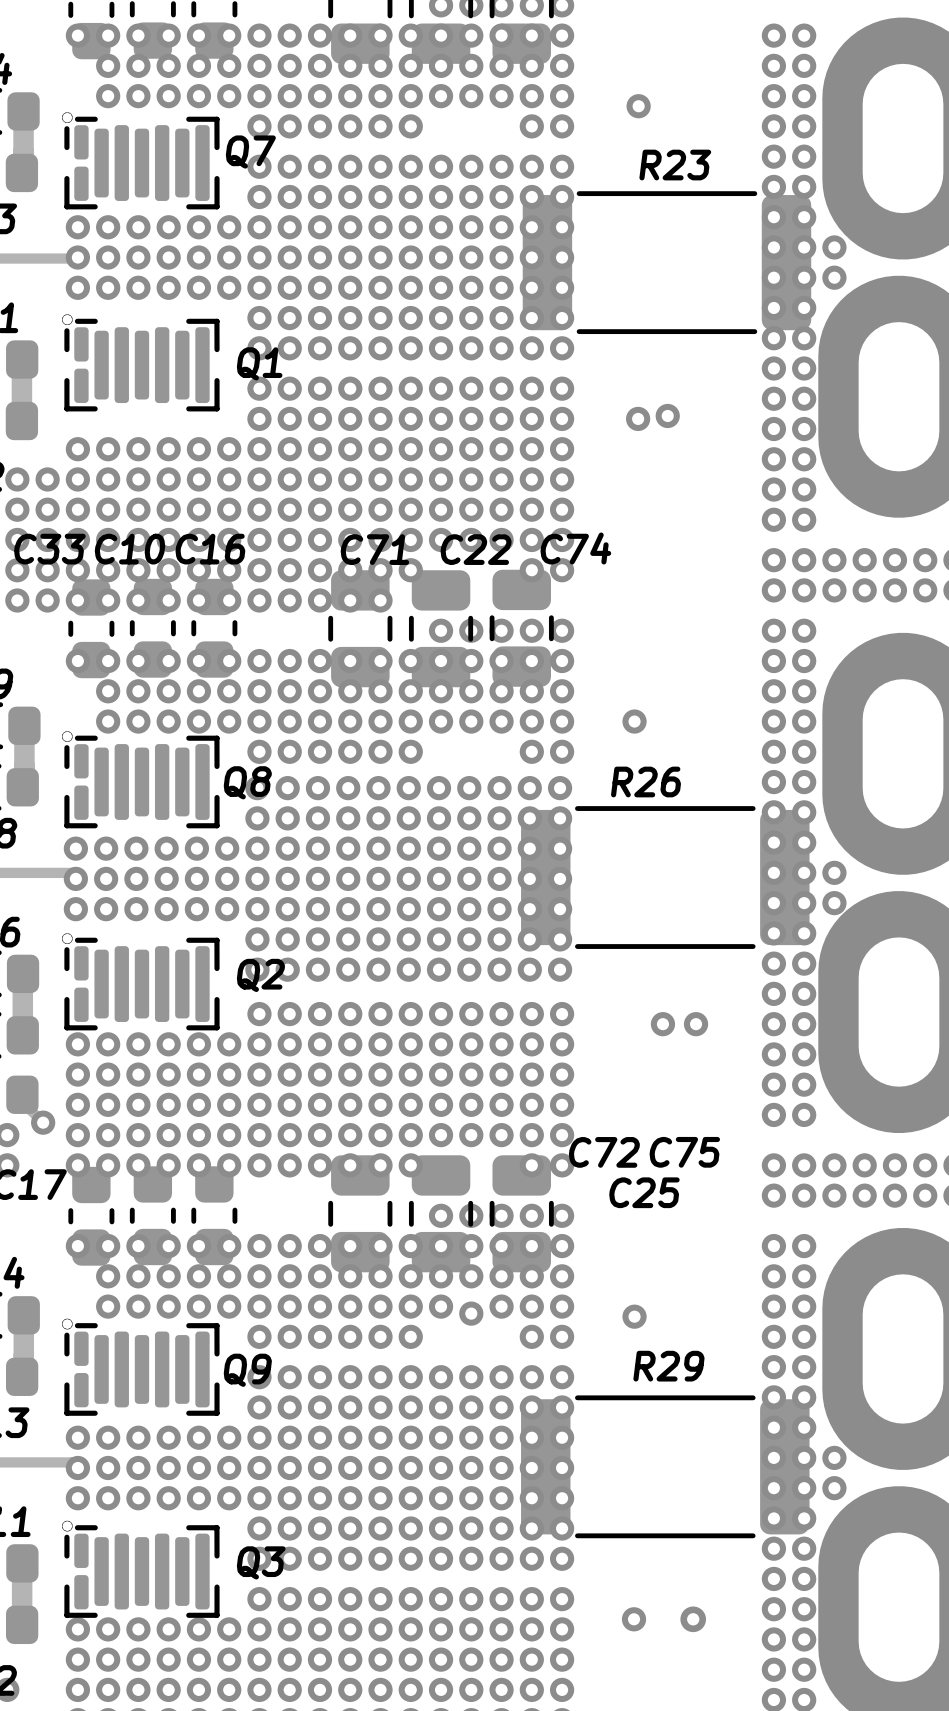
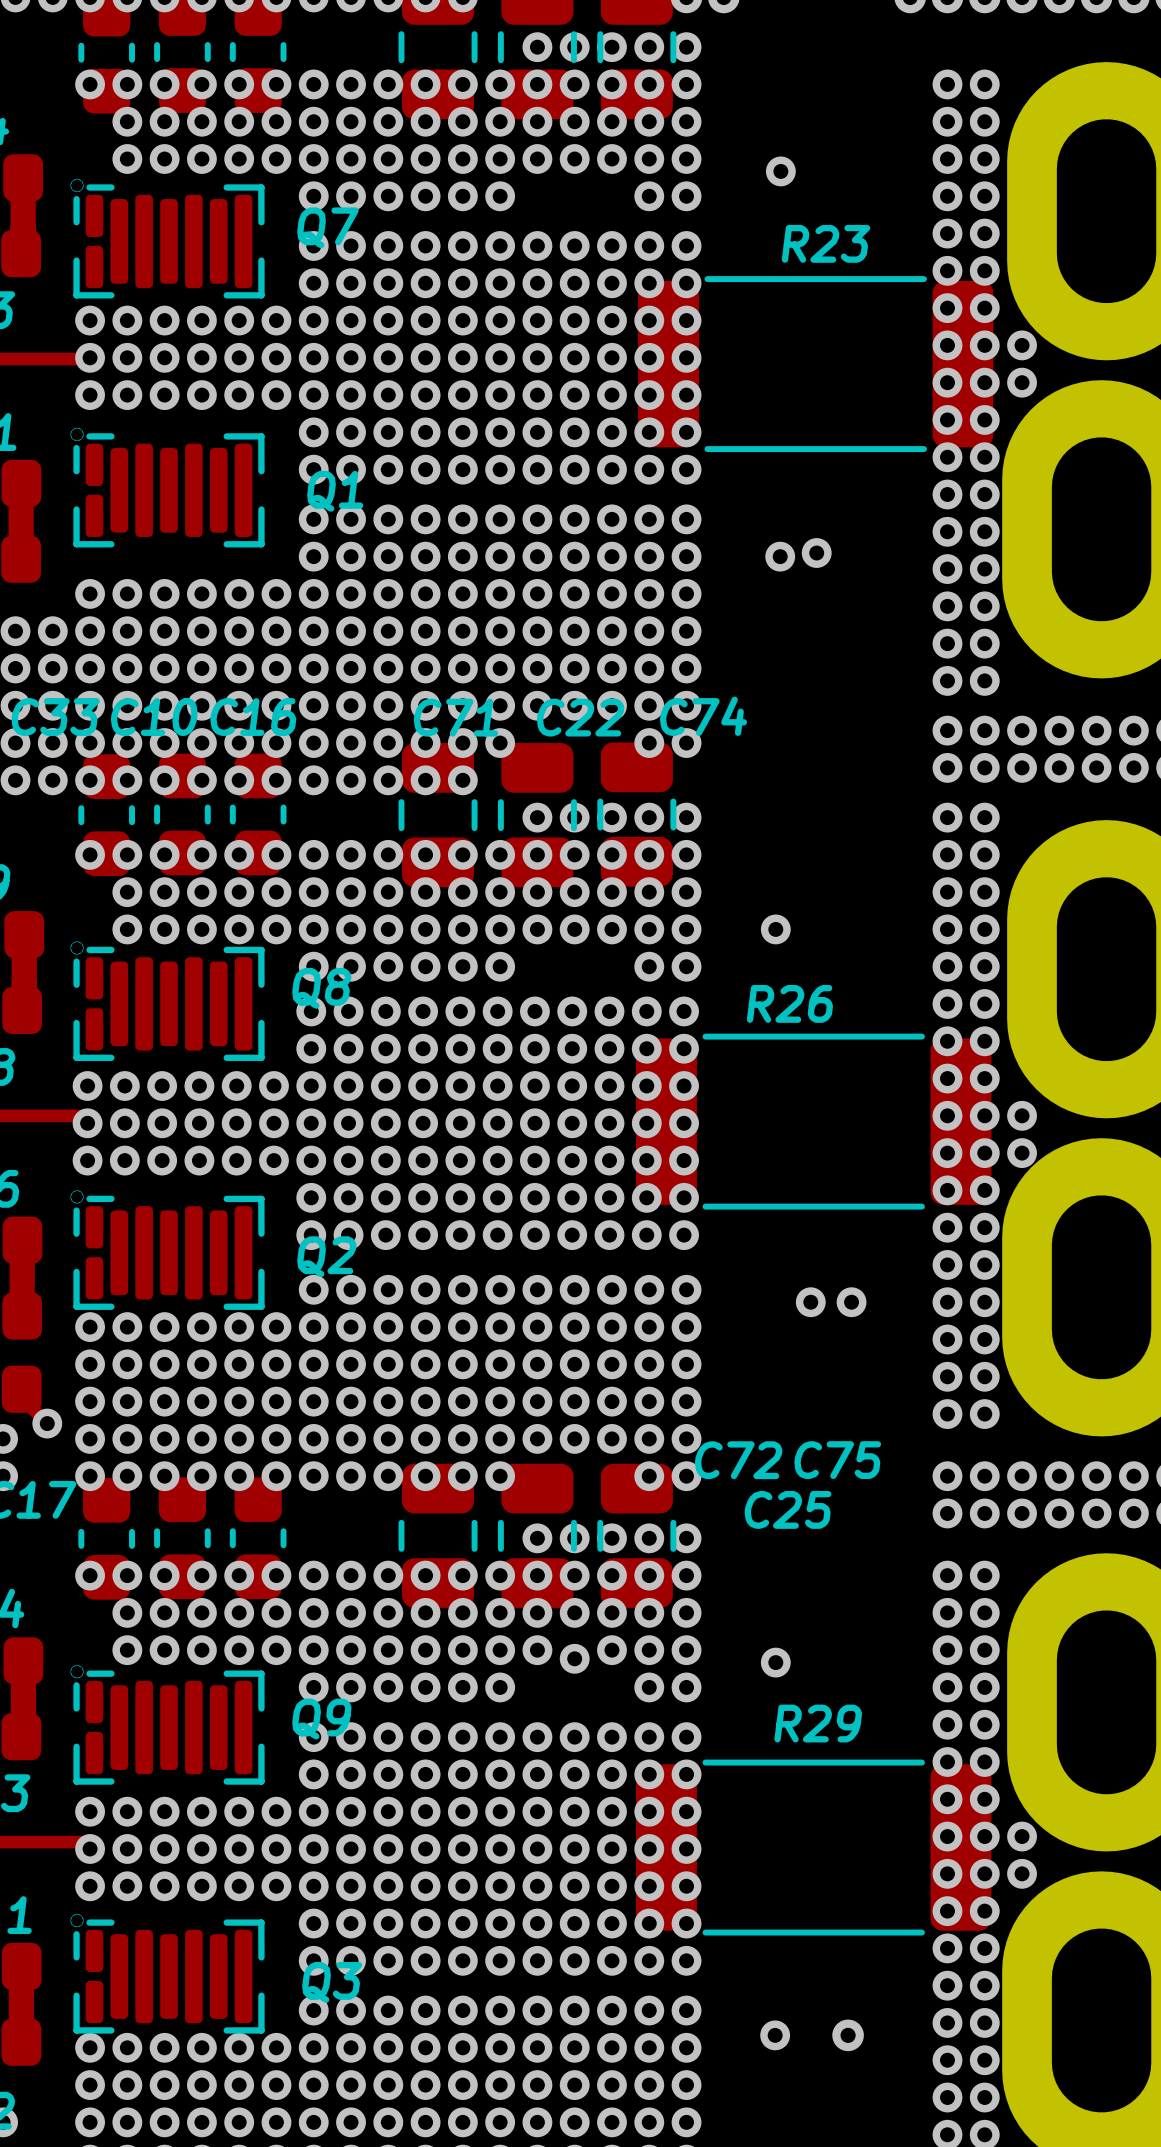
Q7 name position: Q7 (250, 152) -> Q7 (327, 227)
Q1 name position: Q1 (259, 363) -> Q1 (335, 491)
Q8 name position: Q8 (247, 782) -> Q8 (321, 988)
Q2 name position: Q2 (260, 975) -> Q2 (326, 1256)
Q9 name position: Q9 (247, 1370) -> Q9 (321, 1719)
Q3 name position: Q3 (261, 1562) -> Q3 (332, 1982)

